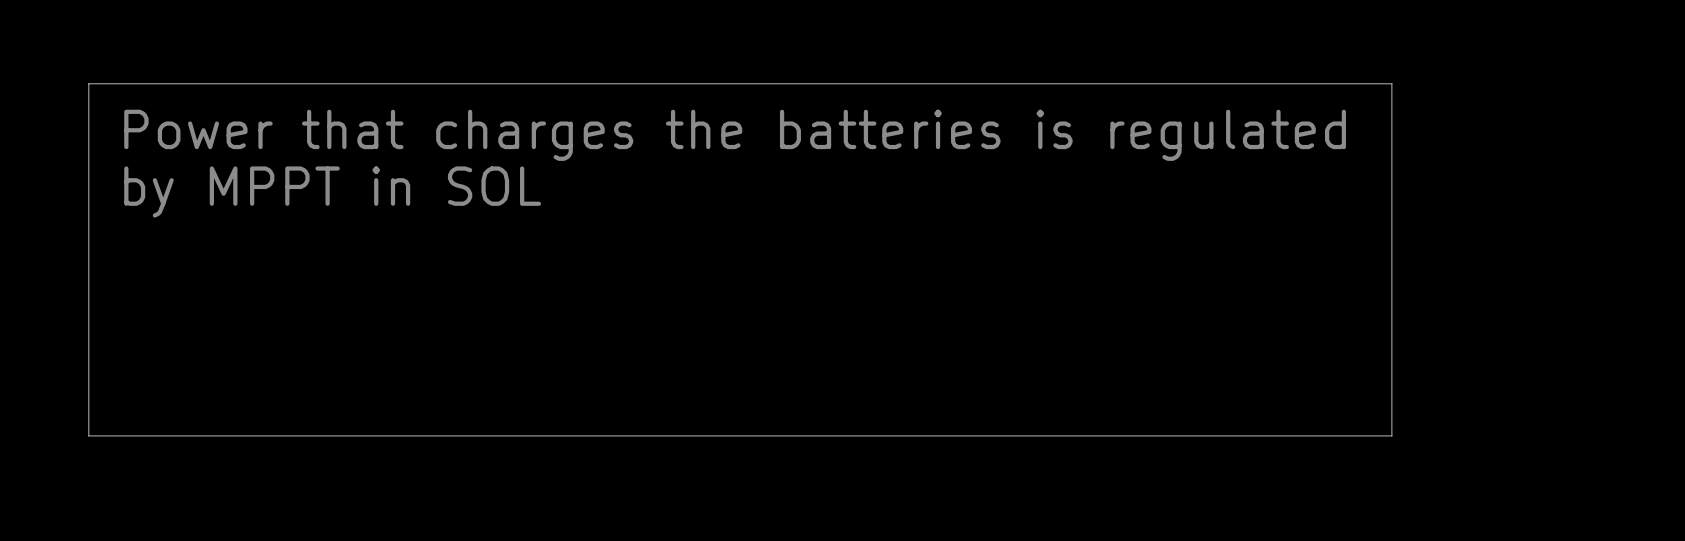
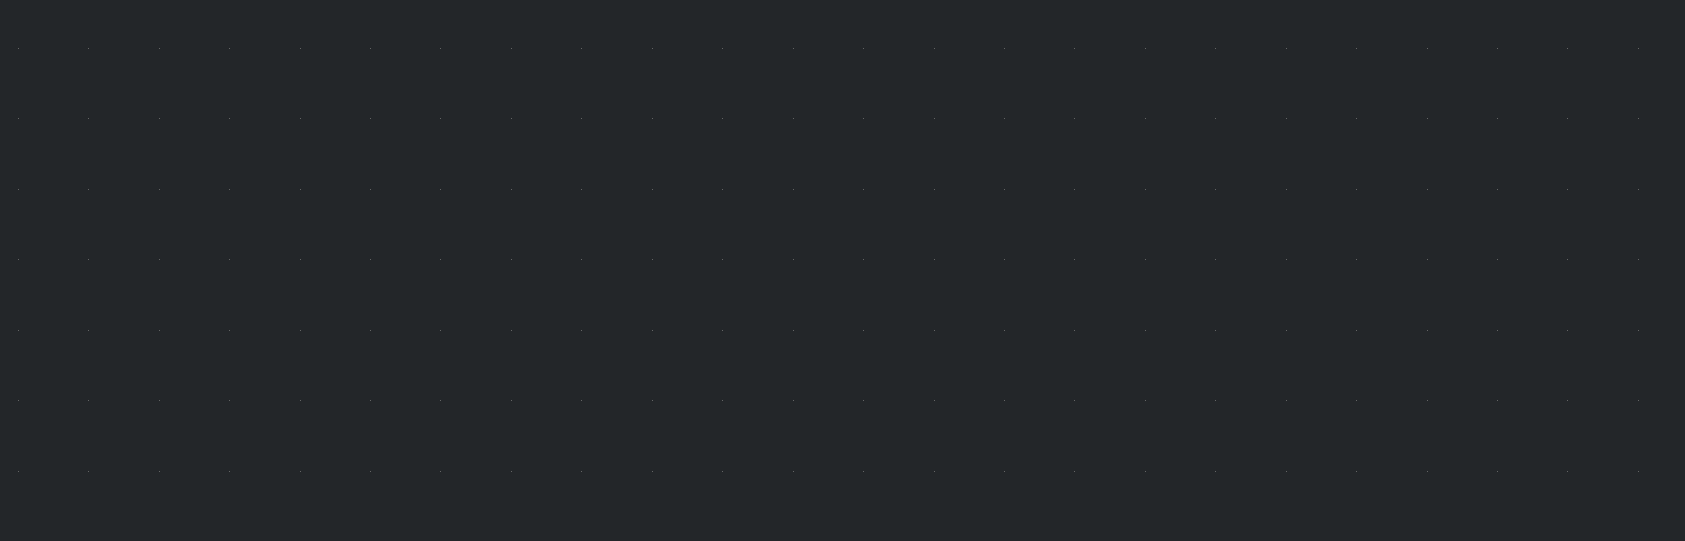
line: (88, 83) (1391, 83) (1391, 435) (88, 435) (88, 83) -> none
text: Power that charges the batteries is regulated (735, 135) -> none
text: by MPPT in SOL (332, 191) -> none

